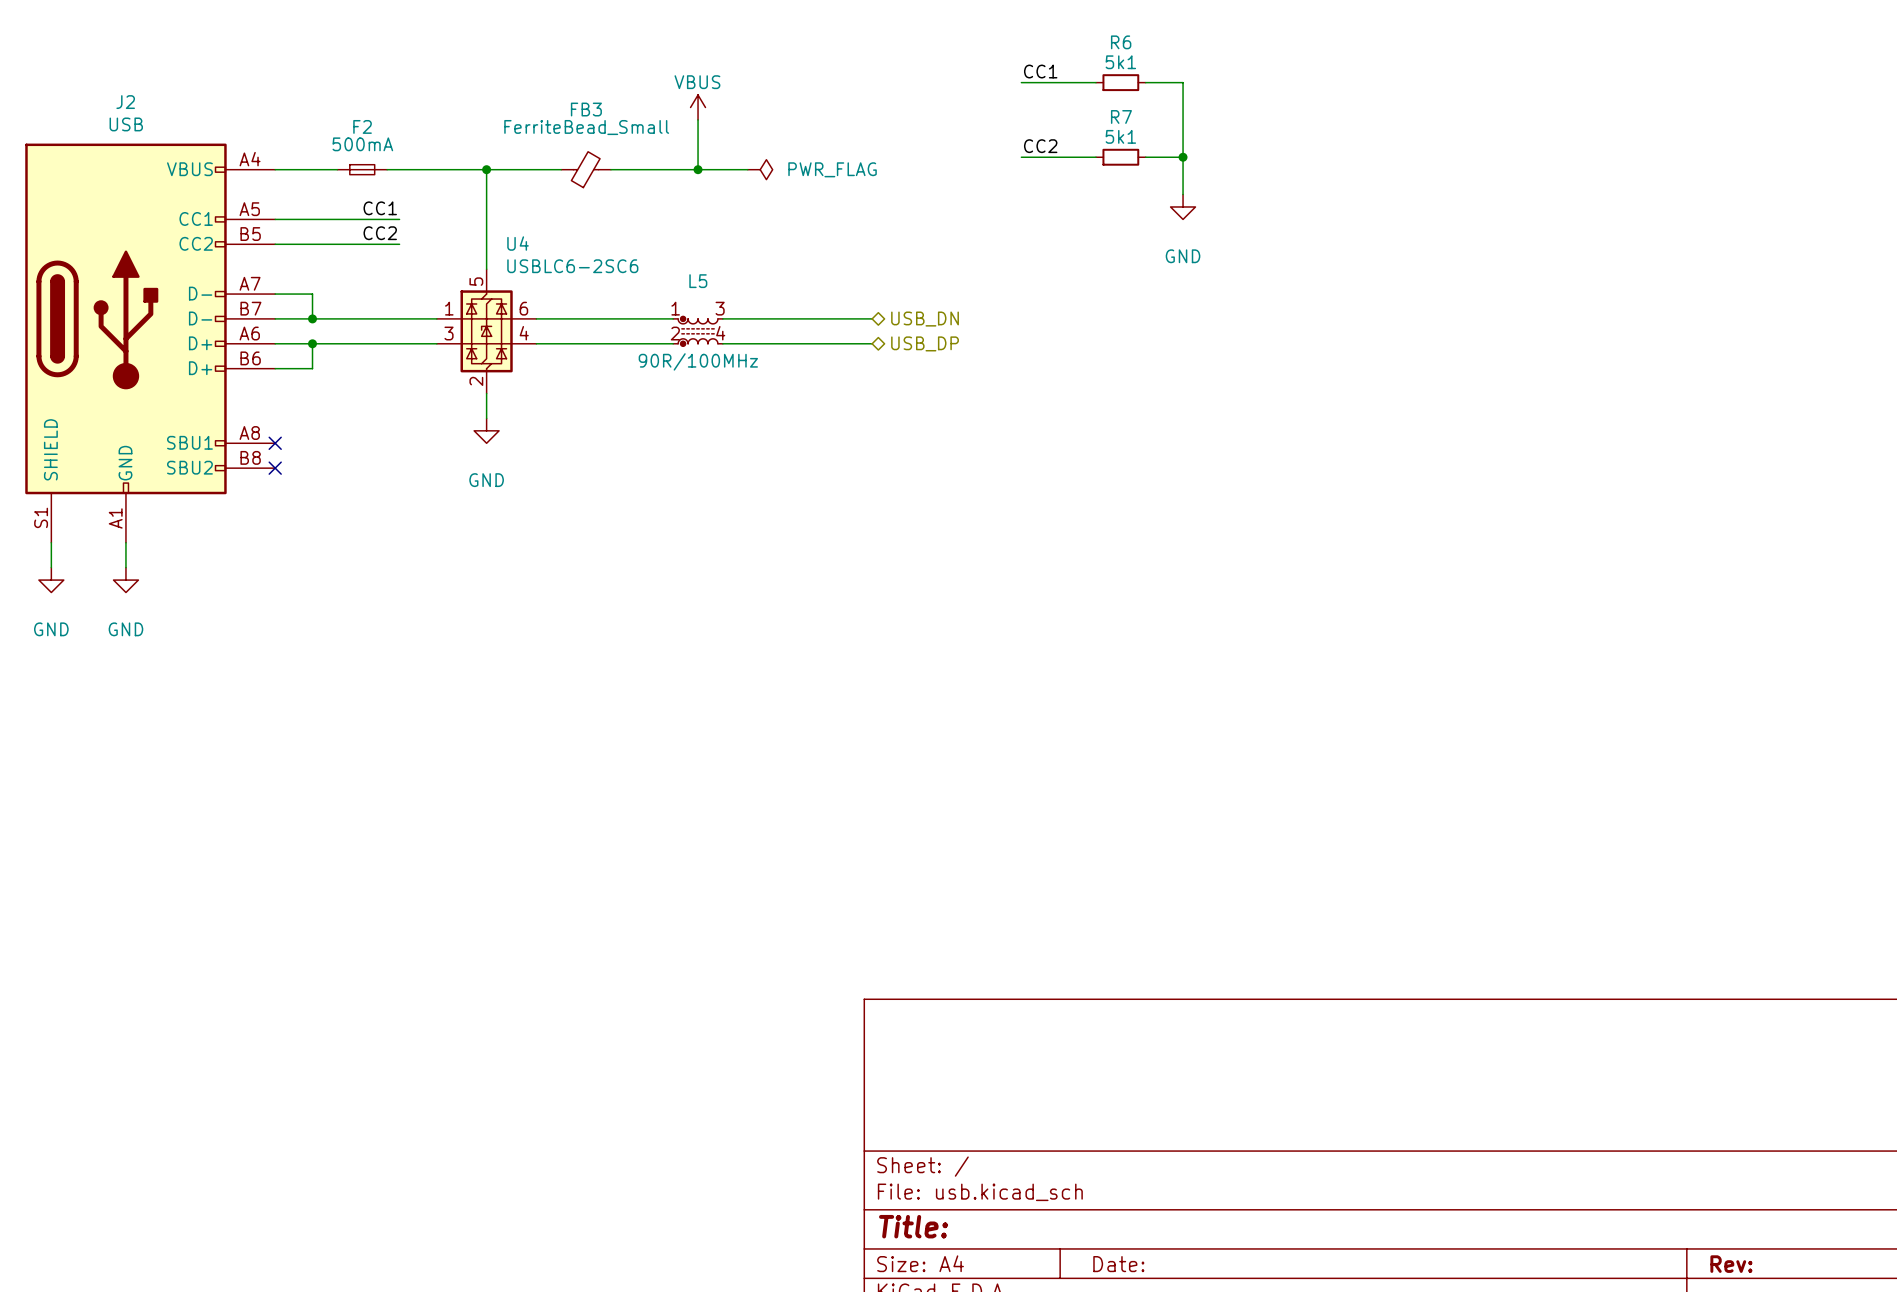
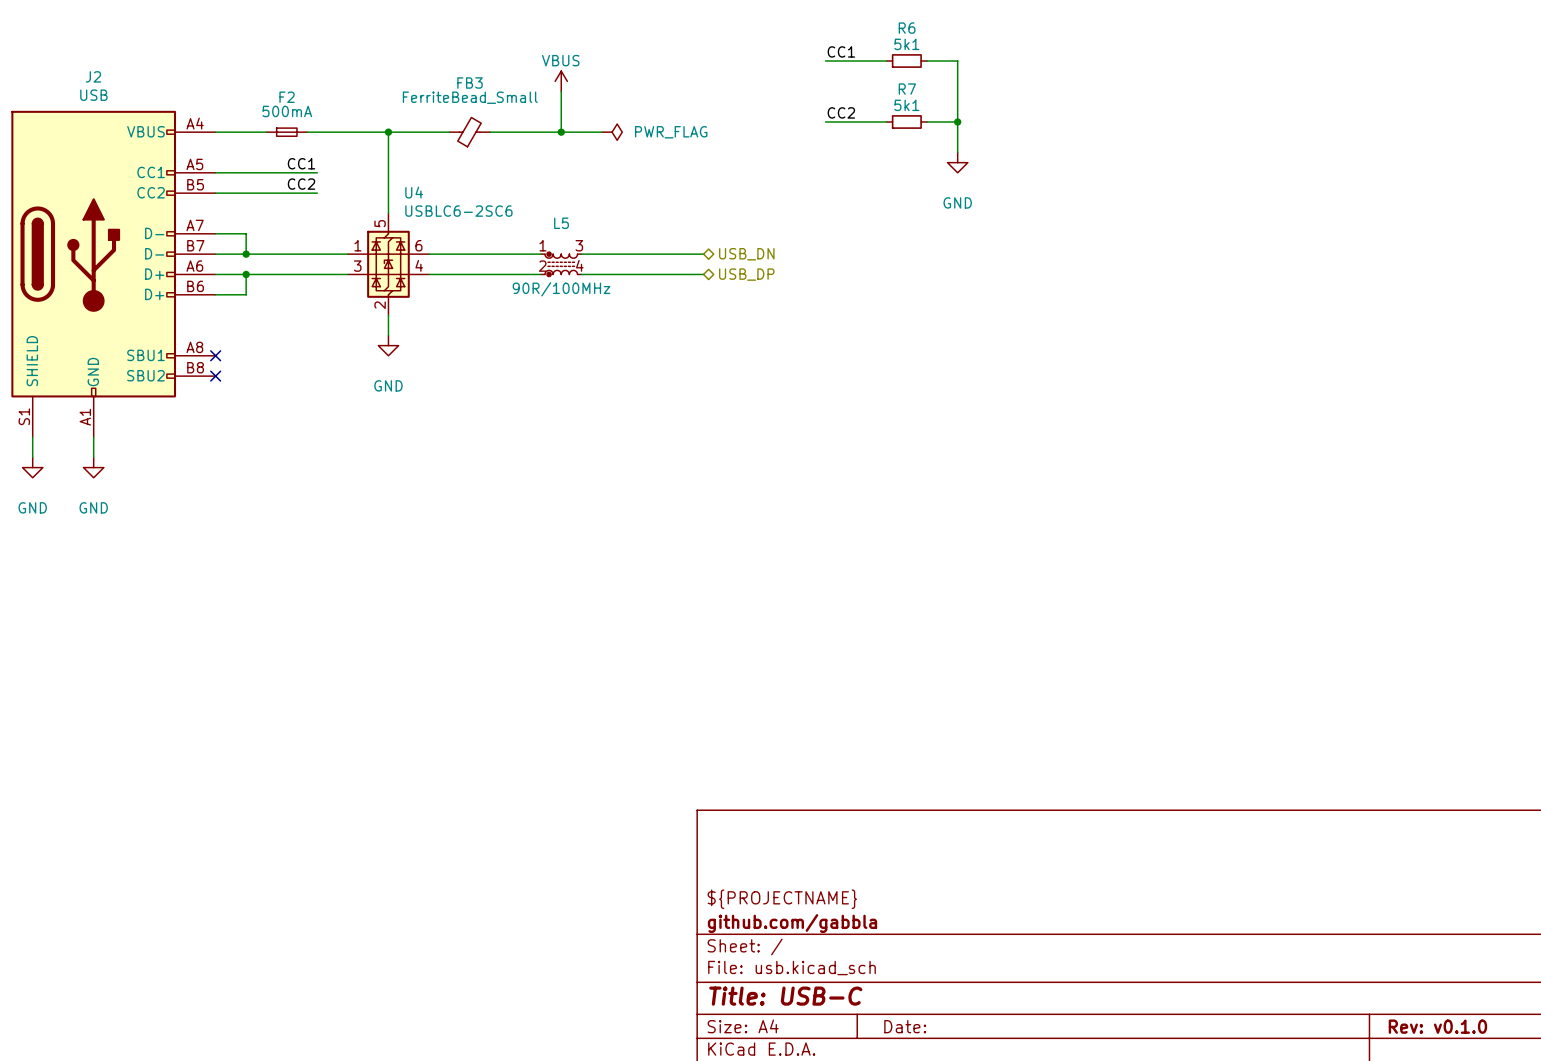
title block: none -> ${PROJECTNAME} (782, 899)
title block: none -> github.com/gabbla (792, 923)
title block: Title: (913, 1226) -> Title: USB-C (785, 996)
title block: Rev: (1731, 1264) -> Rev: v0.1.0 (1437, 1026)

